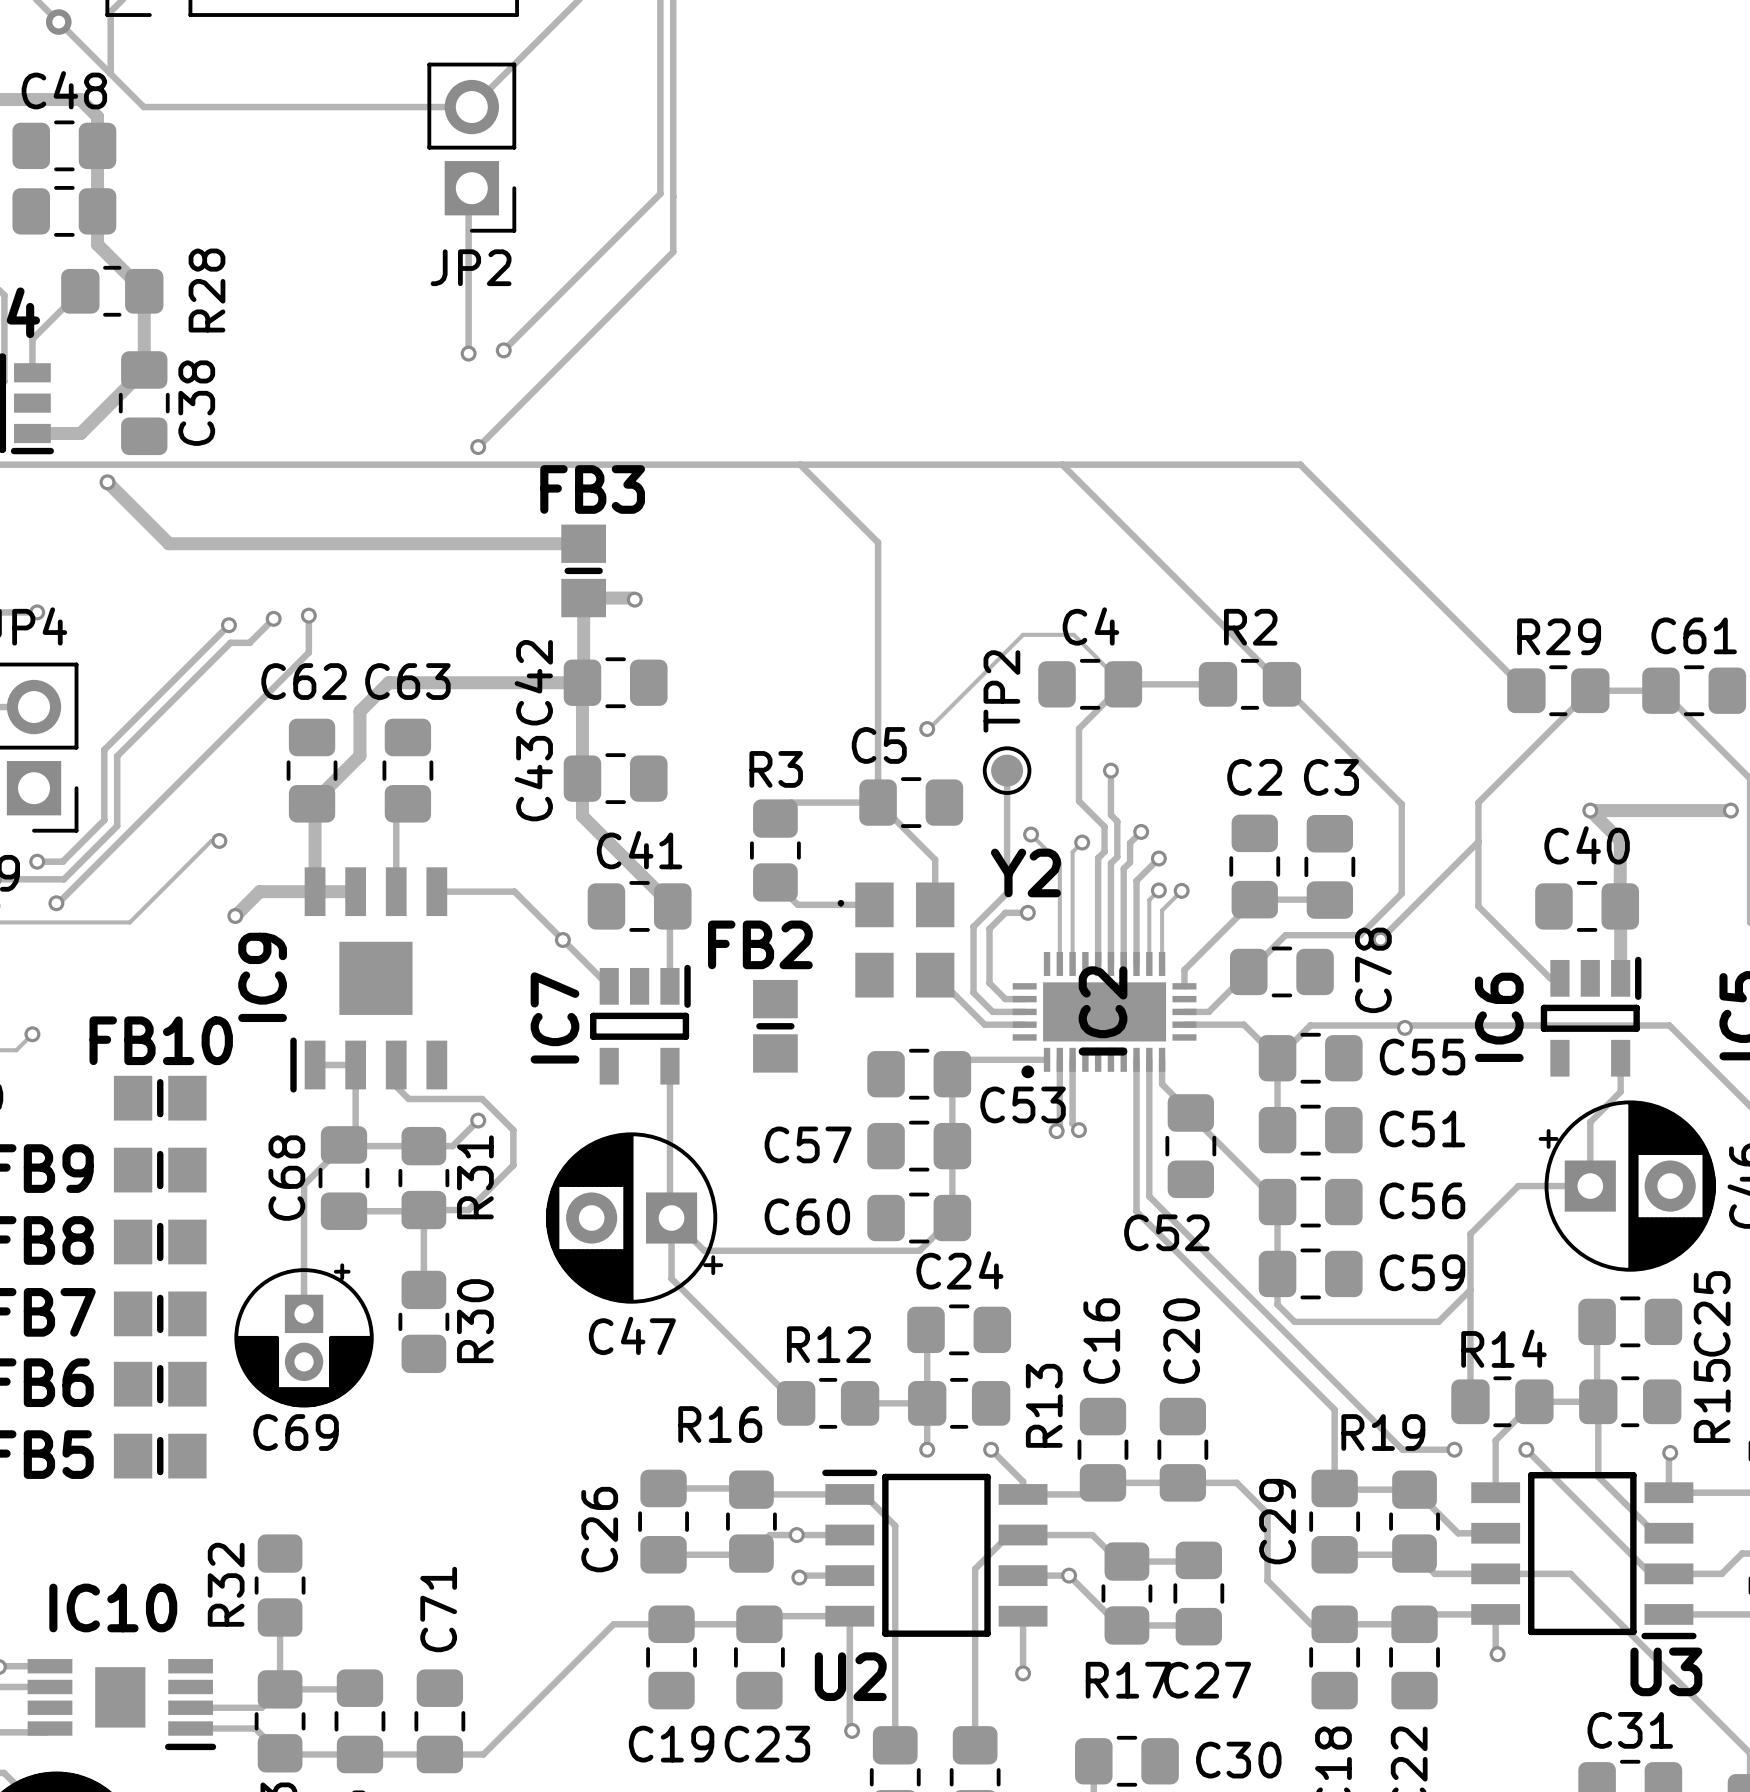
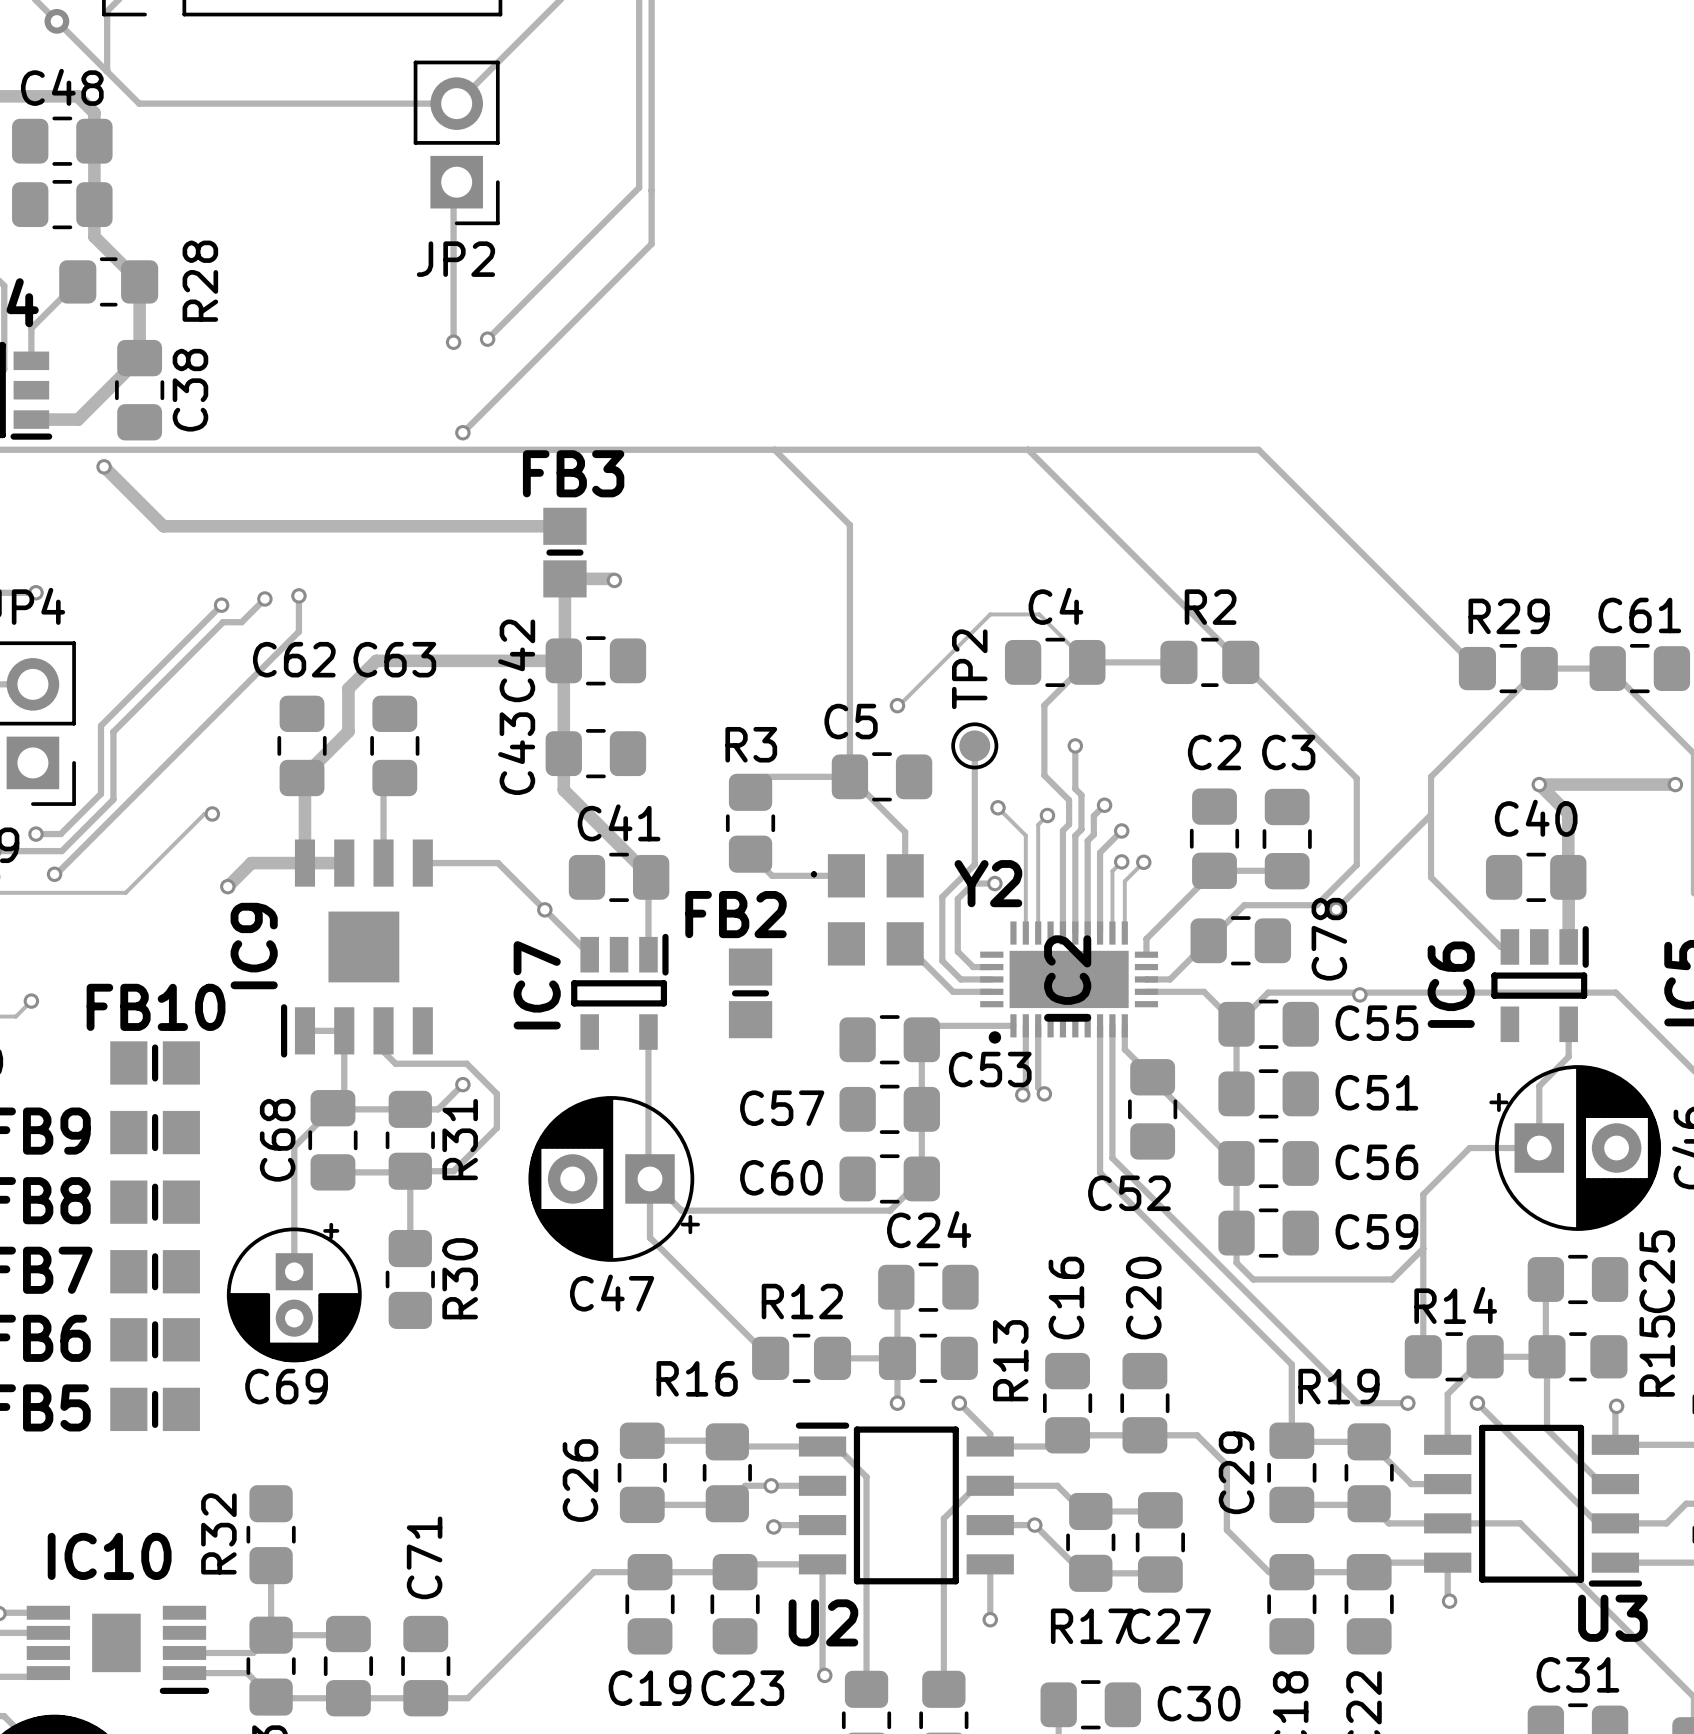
Y2 name position: Y2 (1025, 872) -> Y2 (988, 883)

